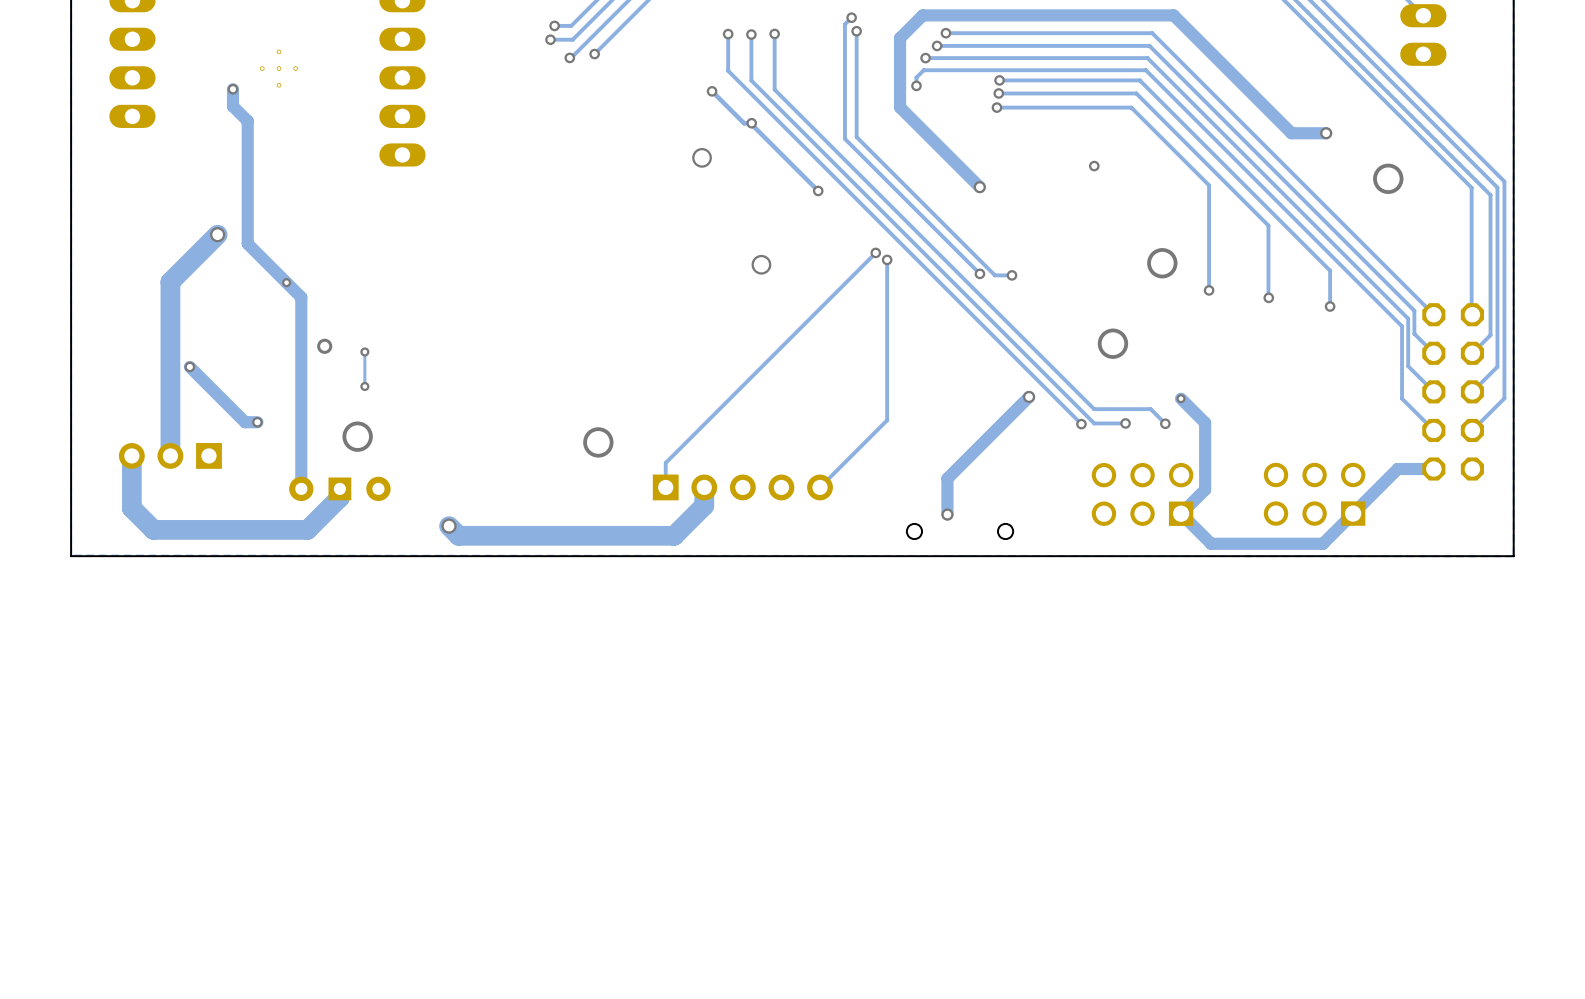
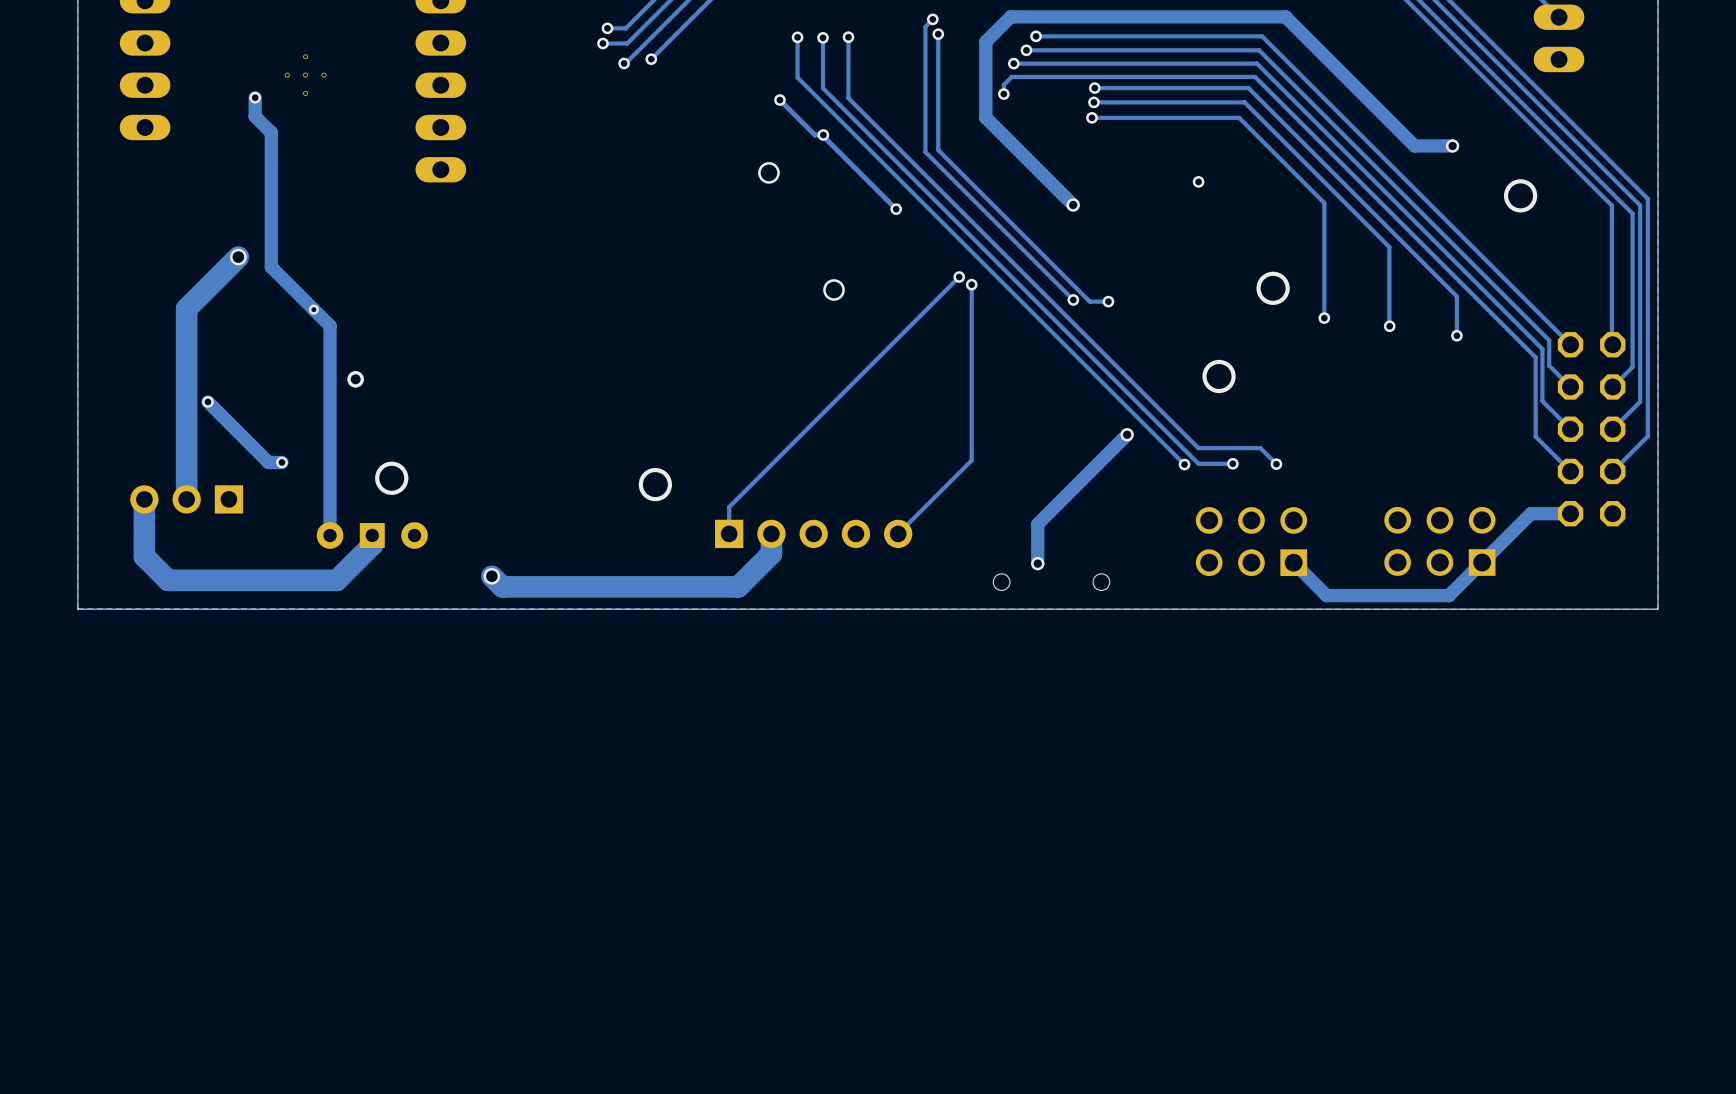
track: (364, 351) (364, 386) -> none
via: (364, 351) -> none
via: (364, 386) -> none
track: (1181, 398) (1205, 422) (1205, 489) (1181, 513) -> none
via: (1181, 398) -> none

